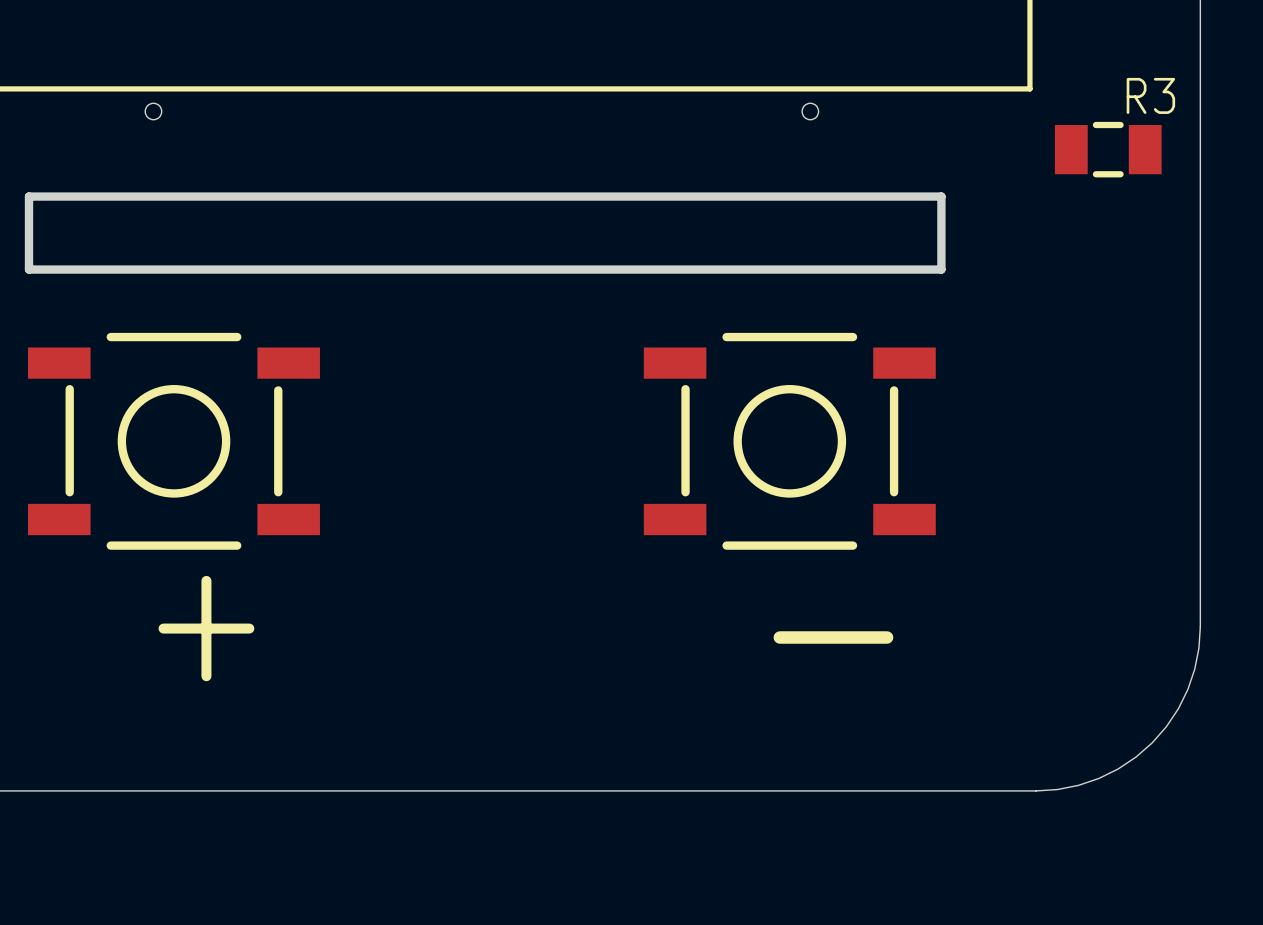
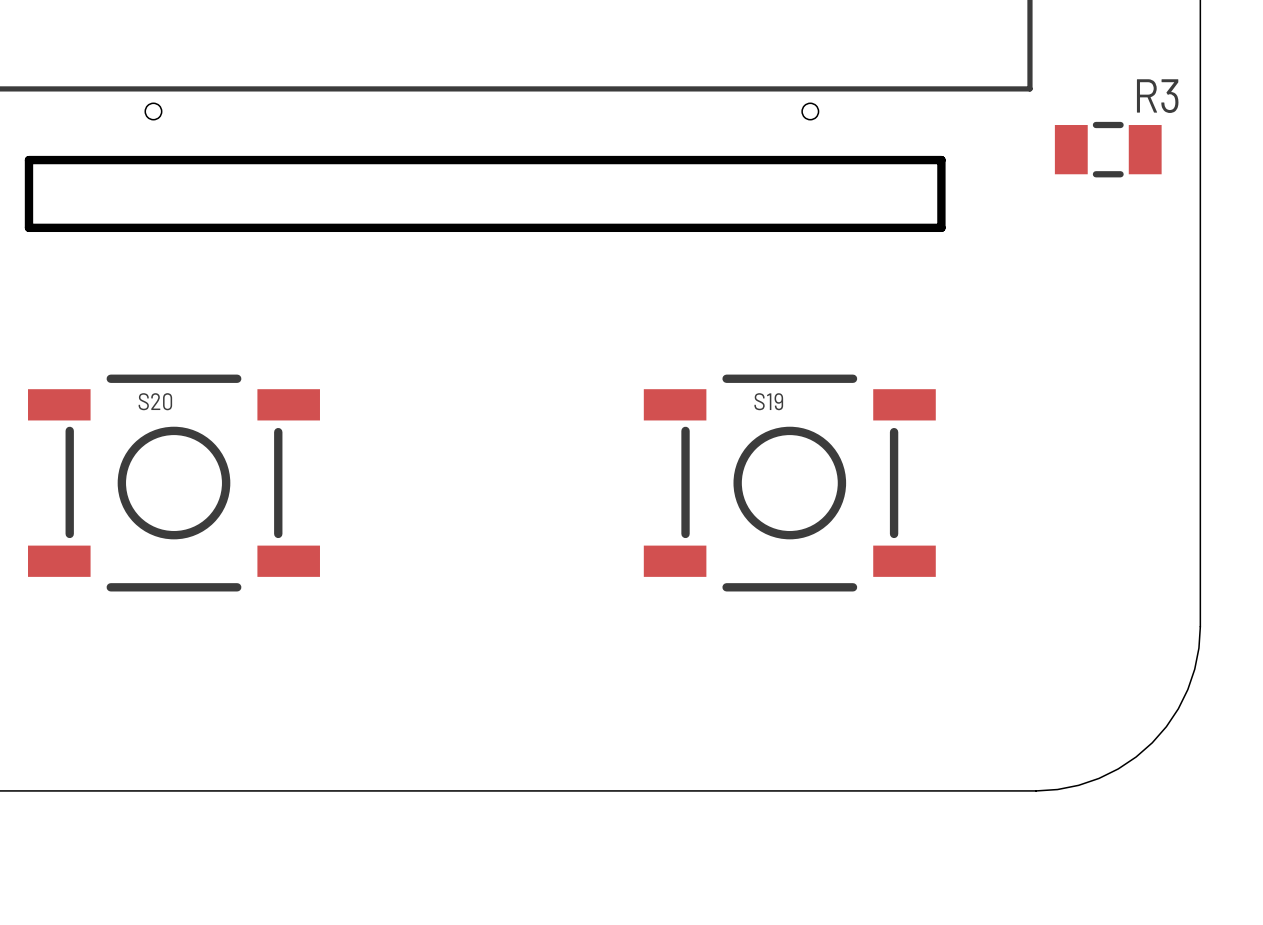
board edge: (28, 196) (941, 196) -> (28, 196) (28, 160) (941, 160) (941, 196)
board edge: (28, 227) (28, 269) (941, 269) (941, 227) -> (28, 227) (941, 227)
part: (173, 441) -> none
part: (789, 441) -> none
S20: none -> (173, 483)
S19: none -> (789, 483)
text: + (206, 628) -> none
text: - (833, 637) -> none

